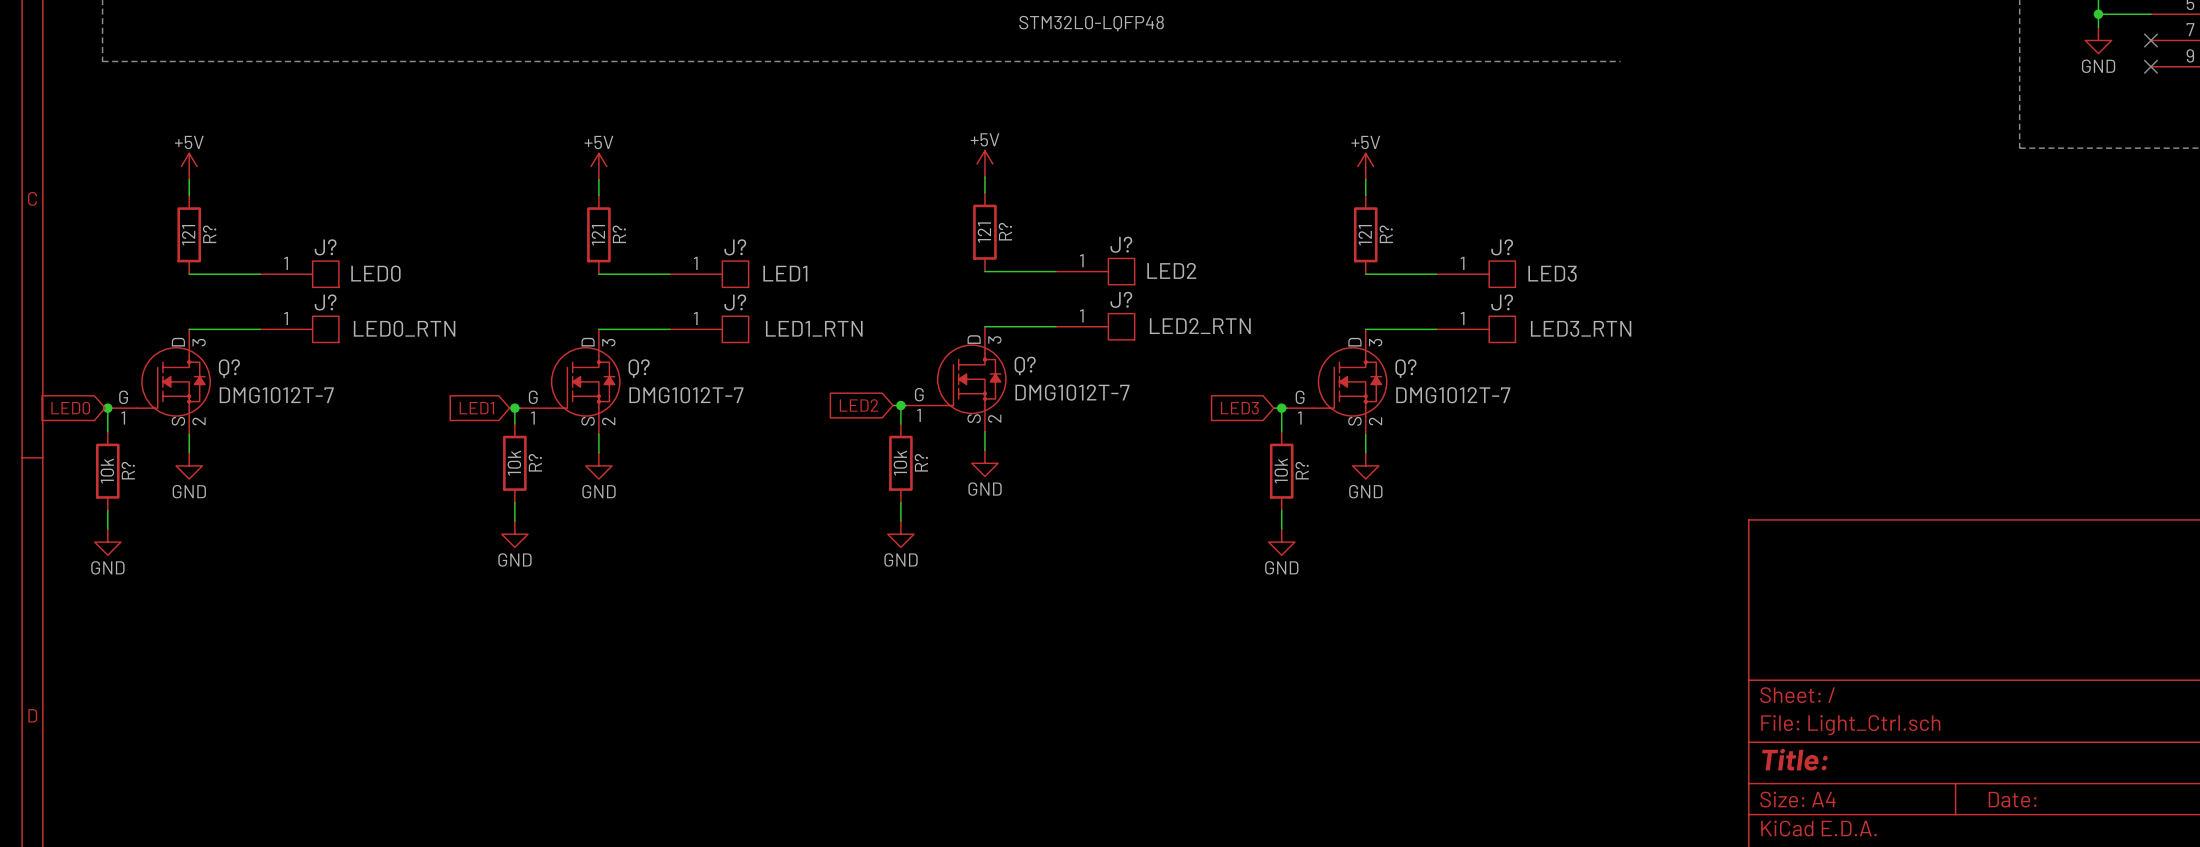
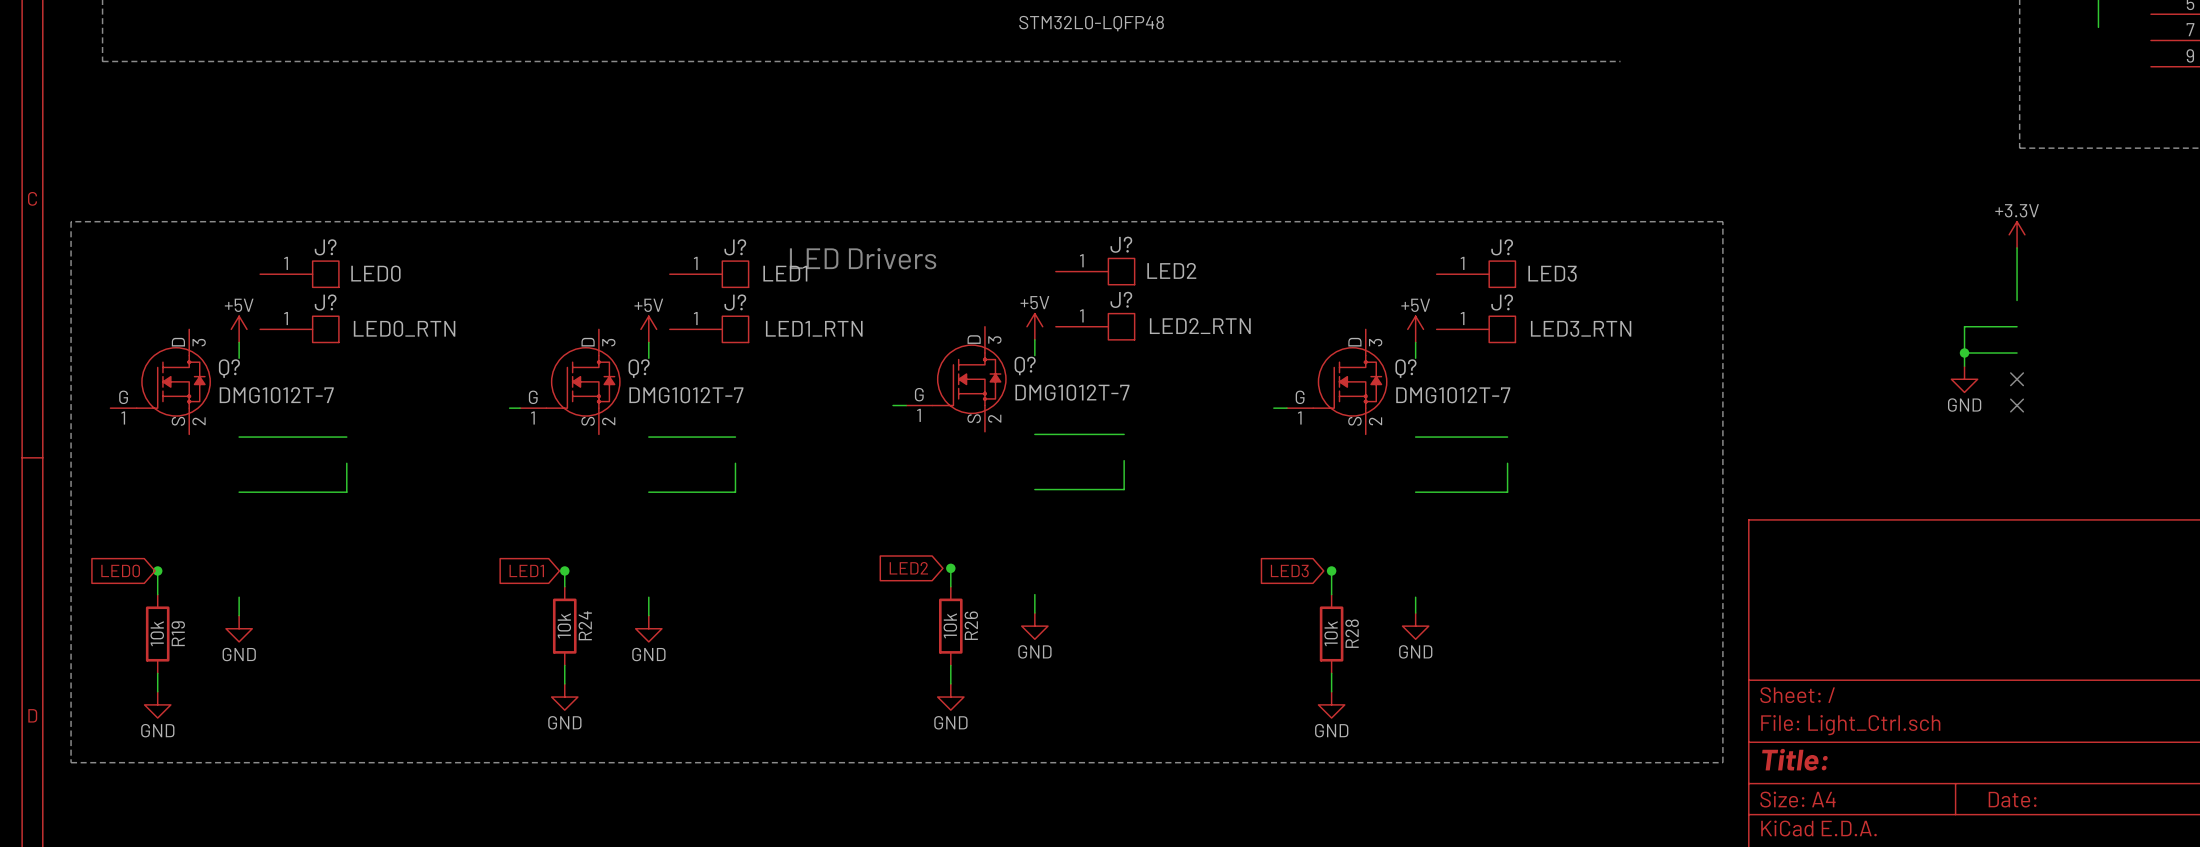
wire: (2098, 14) (2150, 14) -> none
junction: (2098, 14) -> none
power symbol: GND (2098, 40) -> none
no-connect mark: (2150, 40) -> none
no-connect mark: (2150, 66) -> none
power symbol position: +5V (984, 163) -> +5V (1034, 326)
power symbol position: +5V (189, 166) -> +5V (239, 329)
power symbol position: +5V (598, 166) -> +5V (648, 329)
power symbol position: +5V (1365, 166) -> +5V (1415, 329)
wire: (984, 177) (984, 192) -> (1034, 339) (1034, 355)
wire: (189, 179) (189, 195) -> (239, 342) (239, 358)
wire: (598, 179) (598, 195) -> (648, 342) (648, 358)
wire: (1365, 179) (1365, 195) -> (1415, 342) (1415, 358)
line: none -> (71, 221) (1722, 221) (1722, 762) (71, 762) (71, 221)
R?: 121 (984, 232) -> none
R?: 121 (189, 234) -> none
R?: 121 (598, 234) -> none
R?: 121 (1365, 234) -> none
power symbol: none -> +3.3V (2017, 234)
wire: none -> (2017, 247) (2017, 300)
text: none -> LED Drivers (863, 258)
wire: (984, 271) (1055, 271) -> none
wire: (189, 274) (260, 274) -> none
wire: (598, 274) (669, 274) -> none
wire: (1365, 274) (1436, 274) -> none
wire: (984, 326) (1055, 326) -> none
wire: none -> (2017, 326) (1964, 326) (1964, 366)
wire: (189, 329) (260, 329) -> none
wire: (598, 329) (669, 329) -> none
wire: (1365, 329) (1436, 329) -> none
wire: none -> (1964, 353) (2017, 353)
junction: none -> (1964, 353)
power symbol: none -> GND (1964, 379)
no-connect mark: none -> (2017, 379)
global label position: LED2 (858, 405) -> LED2 (908, 568)
wire: (900, 405) (900, 423) -> (950, 568) (950, 586)
junction: (900, 405) -> none
no-connect mark: none -> (2017, 405)
global label position: LED0 (70, 408) -> LED0 (120, 570)
wire: (107, 408) (107, 431) -> (157, 570) (157, 594)
junction: (107, 408) -> none
global label position: LED1 (476, 408) -> LED1 (526, 570)
wire: (514, 408) (514, 423) -> (564, 570) (564, 586)
junction: (514, 408) -> none
global label position: LED3 (1239, 408) -> LED3 (1289, 571)
wire: (1281, 408) (1281, 431) -> (1331, 570) (1331, 594)
junction: (1281, 408) -> none
wire: (984, 431) (984, 450) -> (1034, 594) (1034, 612)
wire: (189, 434) (189, 452) -> (239, 597) (239, 615)
wire: (598, 434) (598, 452) -> (648, 597) (648, 615)
wire: none -> (1034, 434) (1124, 434)
wire: (1365, 434) (1365, 452) -> none
wire: none -> (239, 437) (346, 437)
wire: none -> (648, 437) (735, 437)
wire: none -> (1415, 437) (1507, 437)
wire: none -> (1124, 460) (1124, 489) (1034, 489)
wire: none -> (346, 463) (346, 492) (239, 492)
R?: 10k (514, 463) -> none
wire: none -> (735, 463) (735, 492) (648, 492)
R?: 10k (900, 463) -> none
power symbol: GND (984, 463) -> none
wire: none -> (1507, 463) (1507, 492) (1415, 492)
power symbol: GND (189, 465) -> none
power symbol: GND (598, 465) -> none
power symbol: GND (1365, 465) -> none
R?: 10k (107, 471) -> none
R?: 10k (1281, 471) -> none
wire: (514, 502) (514, 521) -> (564, 665) (564, 683)
wire: (900, 502) (900, 521) -> (950, 665) (950, 683)
wire: (107, 510) (107, 528) -> (157, 673) (157, 691)
wire: (1281, 510) (1281, 528) -> (1331, 673) (1331, 691)
power symbol: GND (514, 534) -> none
power symbol: GND (900, 534) -> none
power symbol: GND (107, 542) -> none
power symbol: GND (1281, 542) -> none
junction: none -> (950, 568)
junction: none -> (157, 570)
junction: none -> (564, 570)
junction: none -> (1331, 570)
wire: none -> (1415, 597) (1415, 612)
R24: none -> 10k (564, 626)
R26: none -> 10k (950, 626)
power symbol: none -> GND (1034, 626)
power symbol: none -> GND (1415, 626)
power symbol: none -> GND (239, 628)
power symbol: none -> GND (648, 628)
R19: none -> 10k (157, 634)
R28: none -> 10k (1331, 634)
power symbol: none -> GND (564, 697)
power symbol: none -> GND (950, 697)
power symbol: none -> GND (157, 704)
power symbol: none -> GND (1331, 704)

